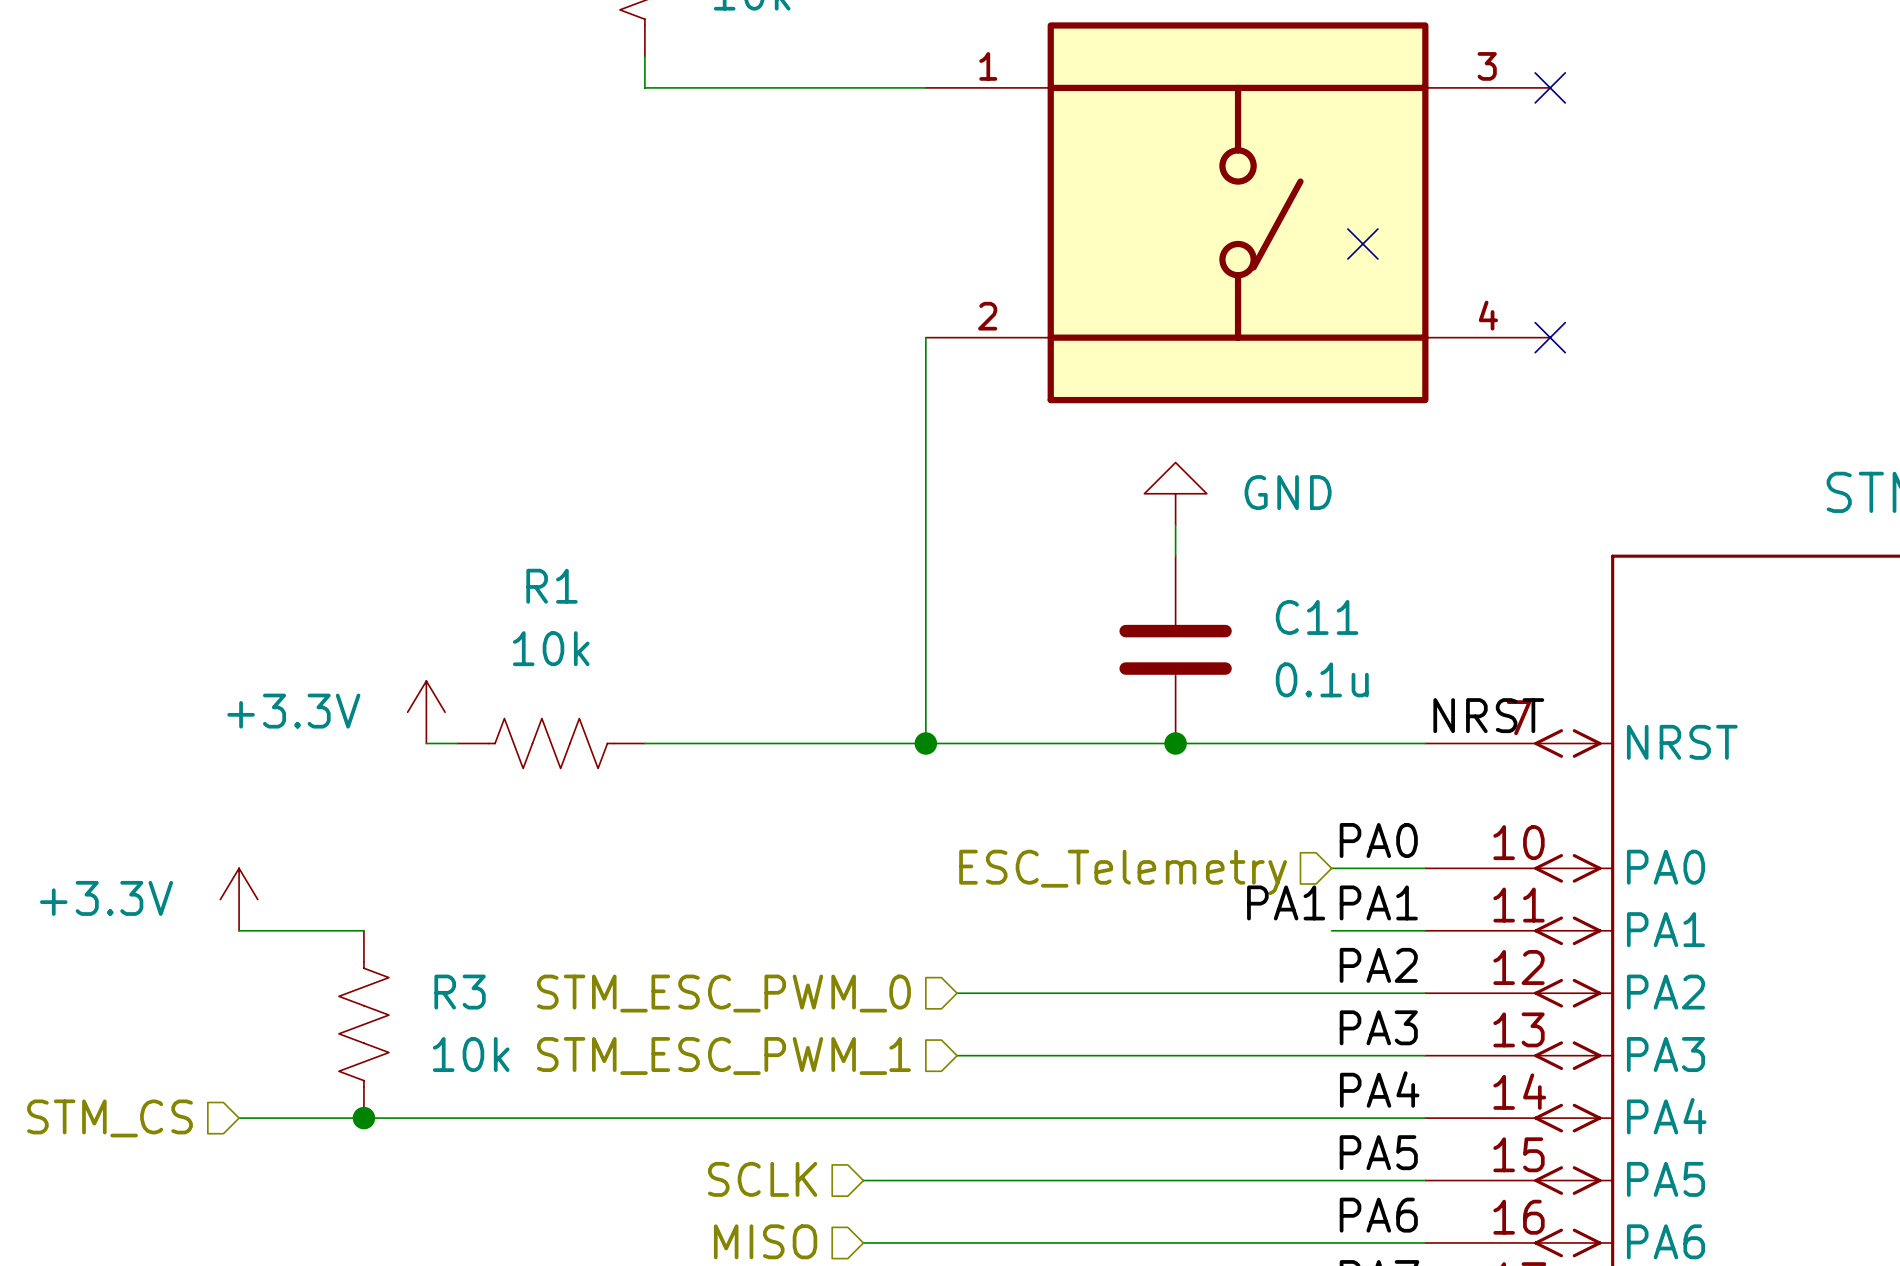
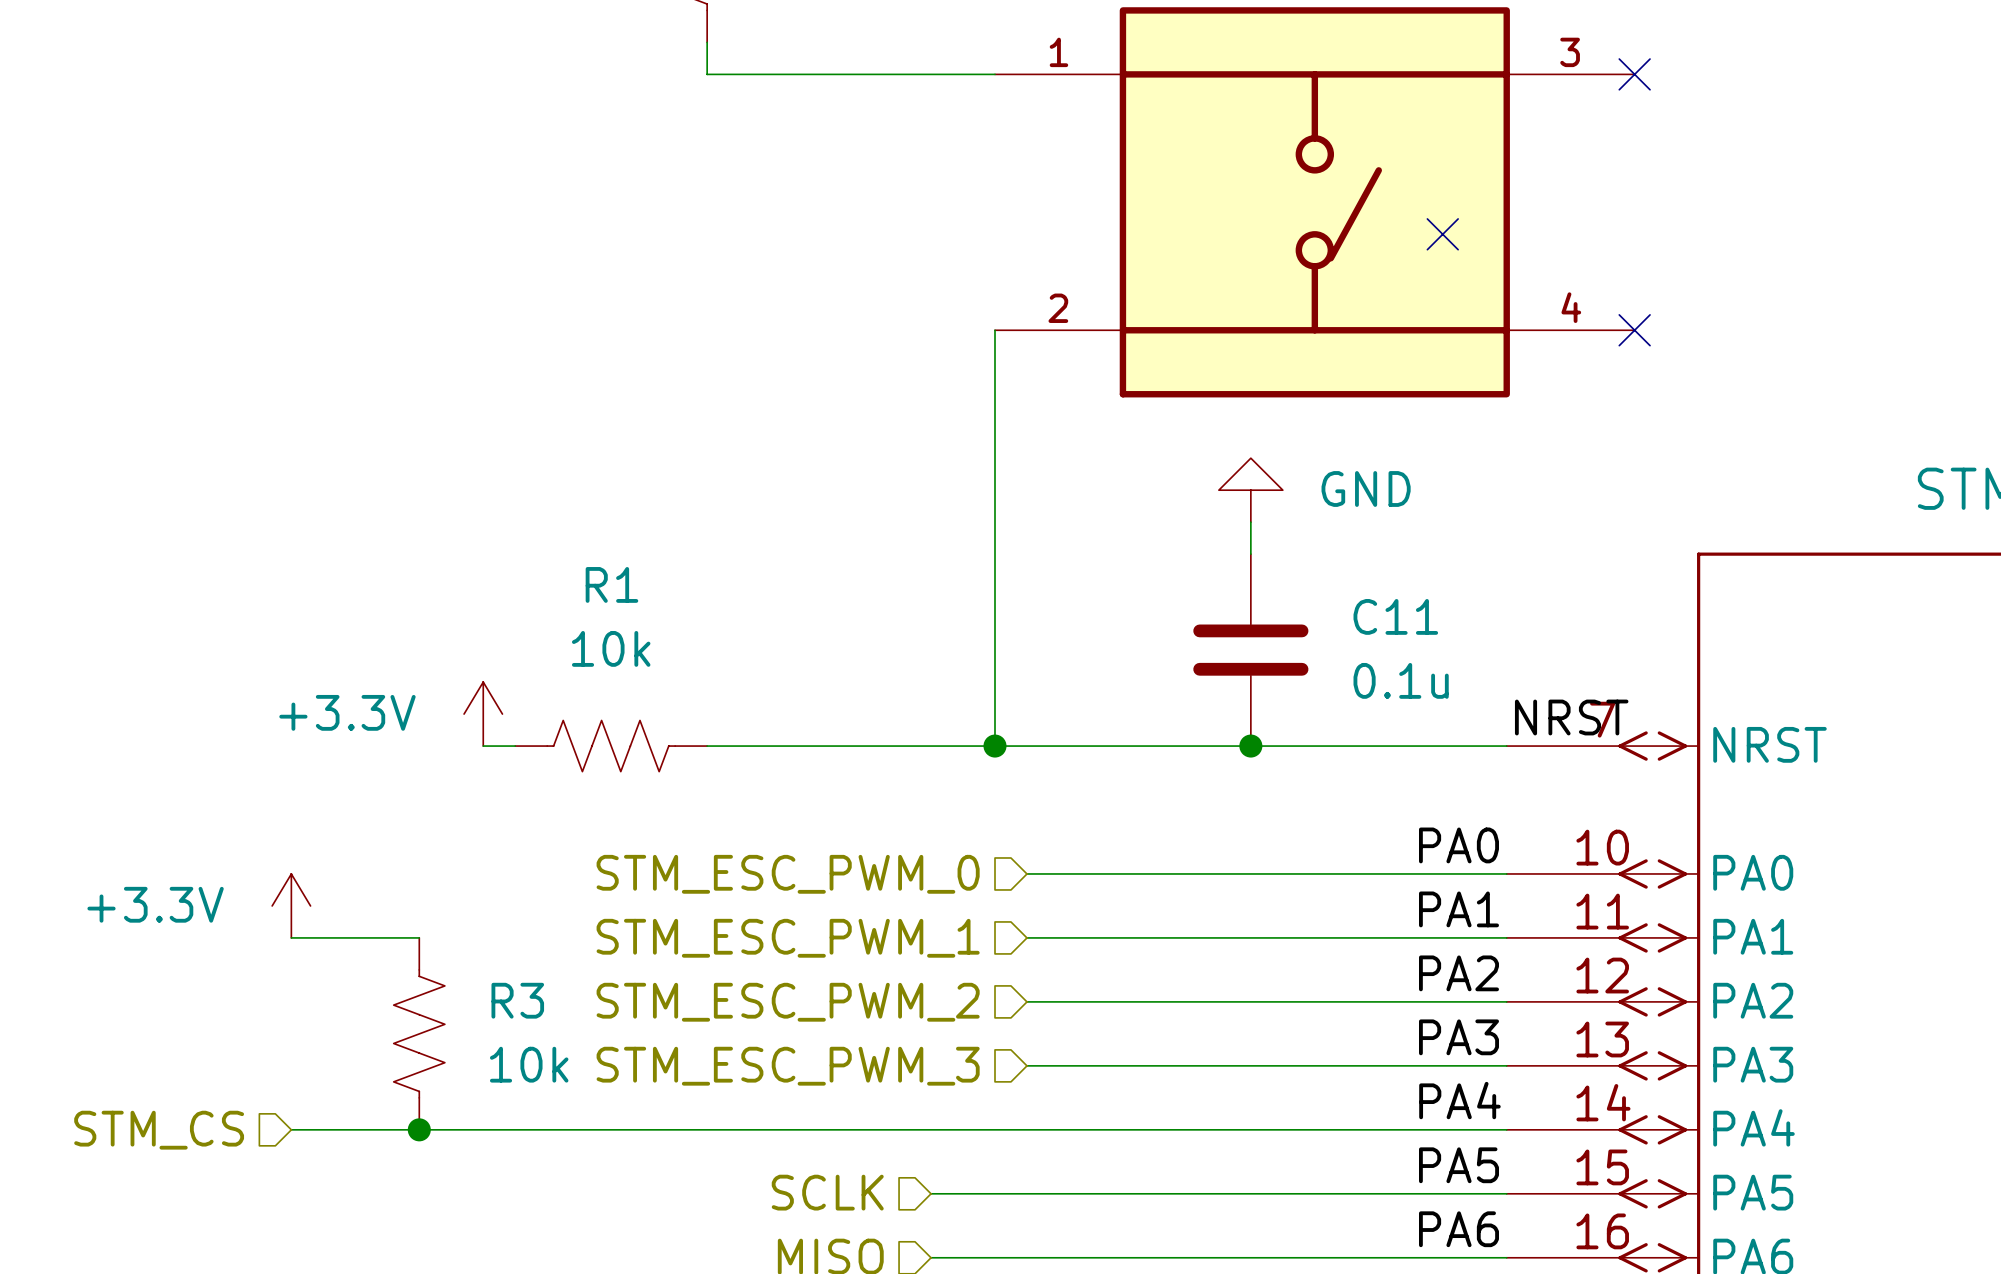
hierarchical label: none -> STM_ESC_PWM_0 (788, 874)
wire: none -> (1026, 873) (1410, 873)
hierarchical label: ESC_Telemetry (1123, 872) -> none
label: PA1 (1286, 902) -> none
wire: none -> (1026, 937) (1410, 937)
hierarchical label: none -> STM_ESC_PWM_1 (788, 938)
hierarchical label: STM_ESC_PWM_0 (723, 993) -> STM_ESC_PWM_2 (788, 1002)
hierarchical label: STM_ESC_PWM_1 (723, 1055) -> STM_ESC_PWM_3 (788, 1066)

